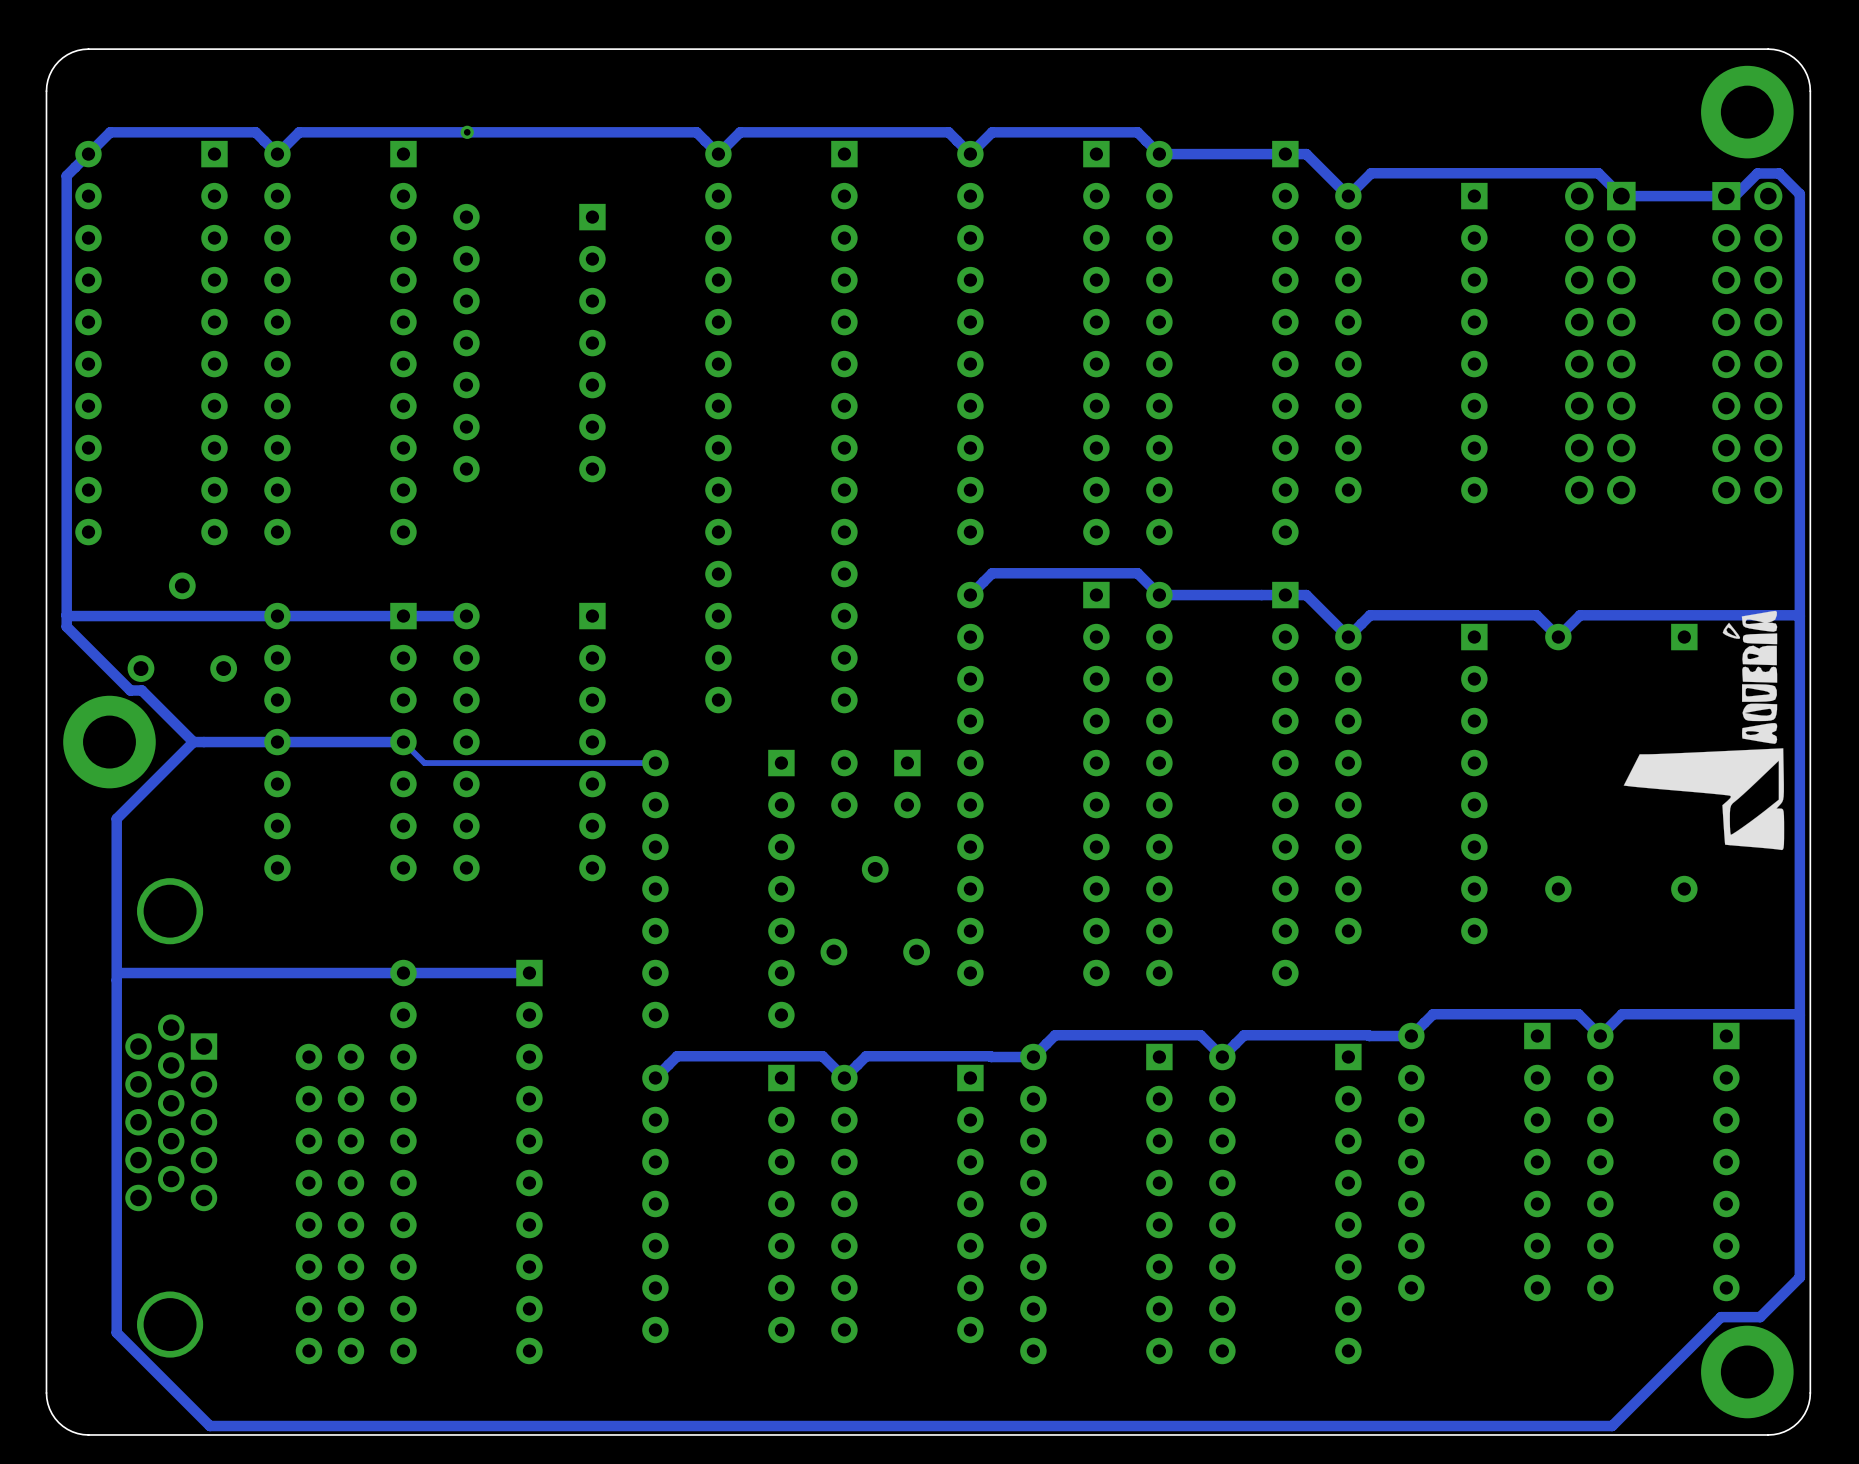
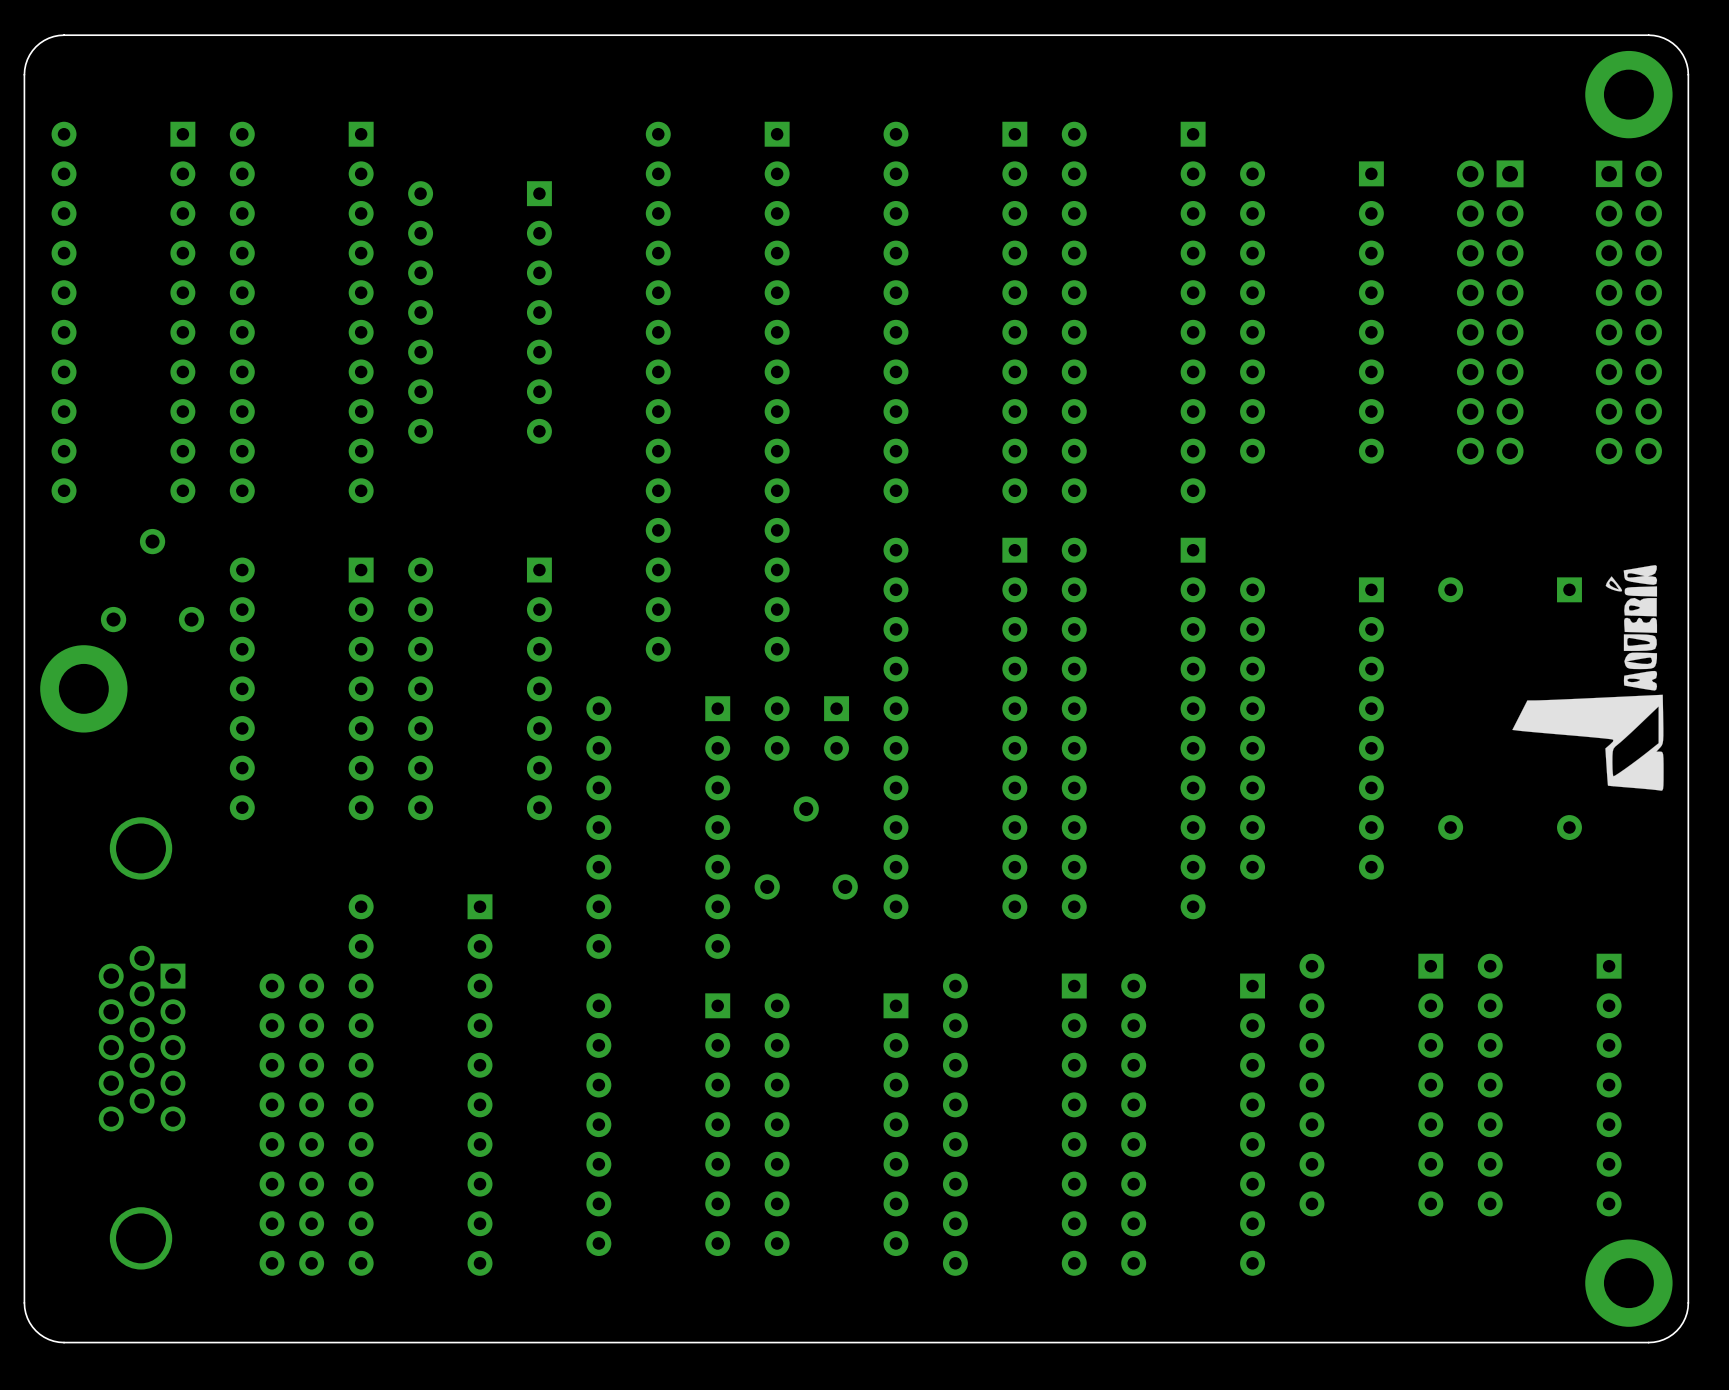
via: (467, 132) -> none
track: (970, 595) (992, 573) (1137, 573) (1159, 595) (1306, 595) (1348, 637) (1370, 615) (1536, 615) (1558, 637) (1580, 615) (1799, 616) -> none
track: (66, 615) (466, 616) -> none
track: (193, 742) (403, 742) (424, 763) (655, 763) -> none
track: (193, 742) (141, 690) (130, 690) (66, 626) (66, 175) (110, 132) (255, 132) (277, 154) (299, 132) (696, 132) (718, 154) (740, 132) (948, 132) (970, 154) (992, 132) (1137, 132) (1159, 154) (1306, 154) (1348, 196) (1371, 173) (1598, 173) (1621, 196) (1734, 196) (1757, 173) (1779, 173) (1799, 194) (1799, 1015) -> none
track: (193, 742) (116, 818) (116, 1332) (209, 1426) (1612, 1426) (1721, 1317) (1760, 1317) (1799, 1277) (1799, 1015) -> none
track: (529, 973) (119, 973) -> none
track: (1799, 1015) (1622, 1014) (1600, 1036) (1578, 1014) (1433, 1014) (1411, 1036) (1244, 1035) (1222, 1057) (1200, 1035) (1055, 1035) (1033, 1057) (866, 1056) (844, 1078) (822, 1056) (677, 1056) (655, 1078) -> none

